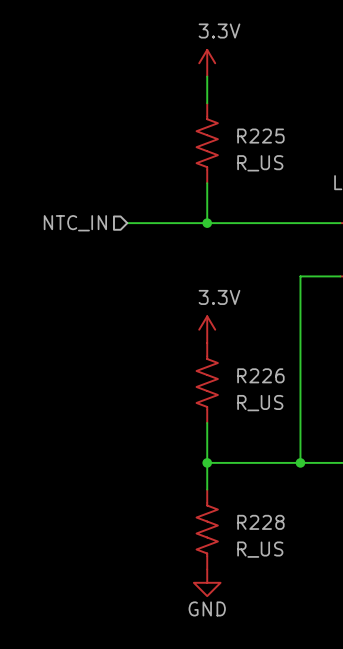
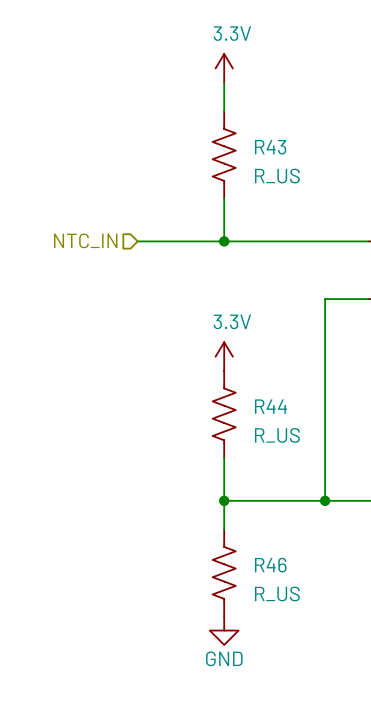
R225 name: R225 (260, 136) -> R43 (270, 147)
R226 name: R226 (260, 375) -> R44 (271, 406)
R228 name: R228 (260, 522) -> R46 (270, 565)

